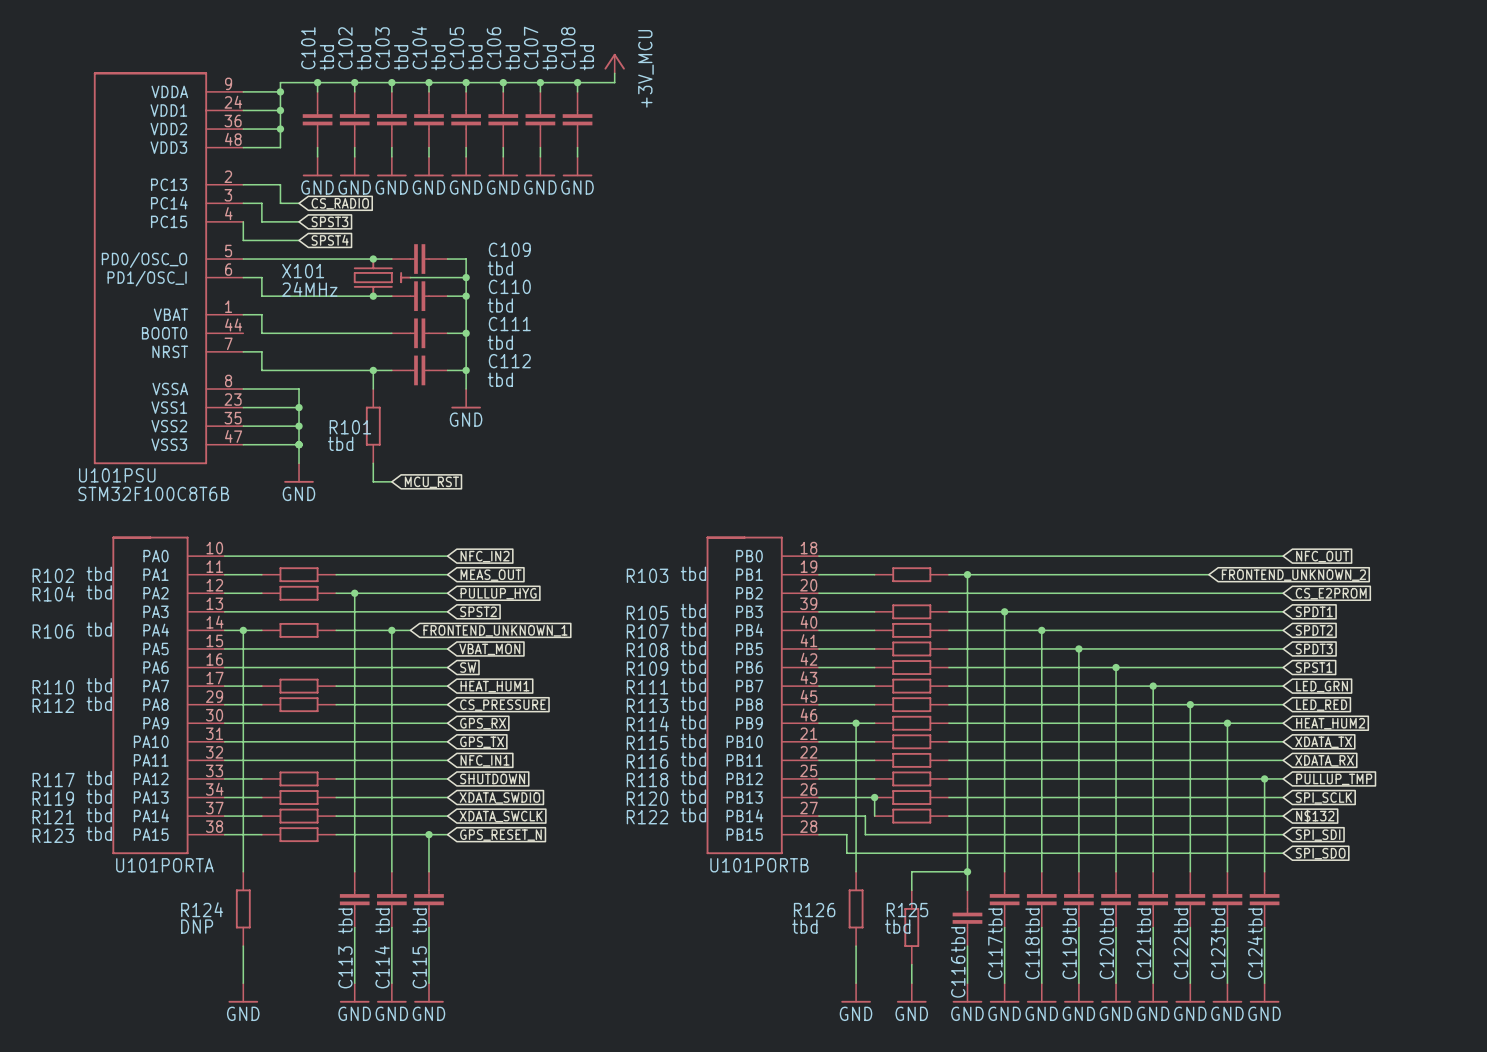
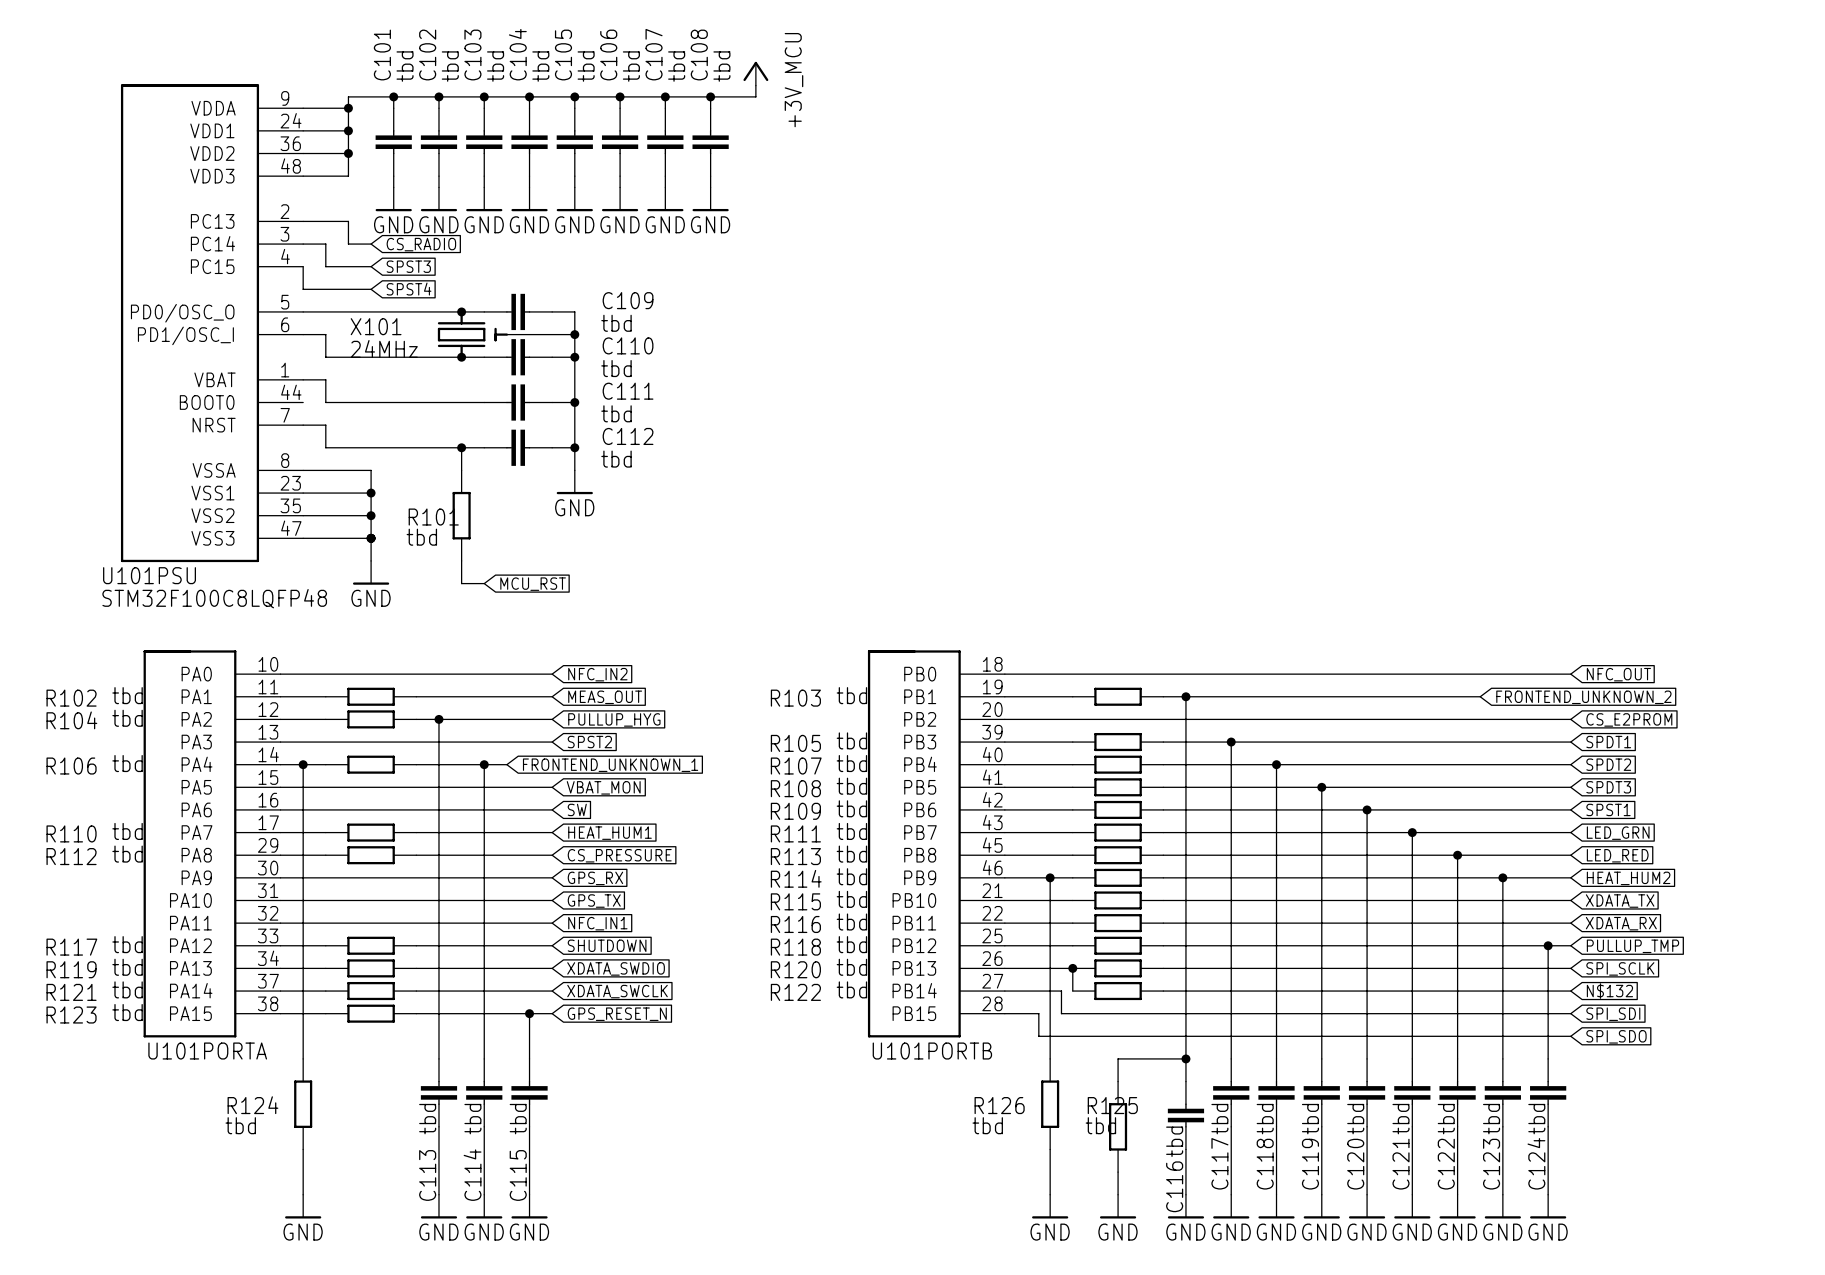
U101PSU value: STM32F100C8T6B (153, 493) -> STM32F100C8LQFP48 (214, 598)
R124 value: DNP (197, 926) -> tbd (240, 1125)

